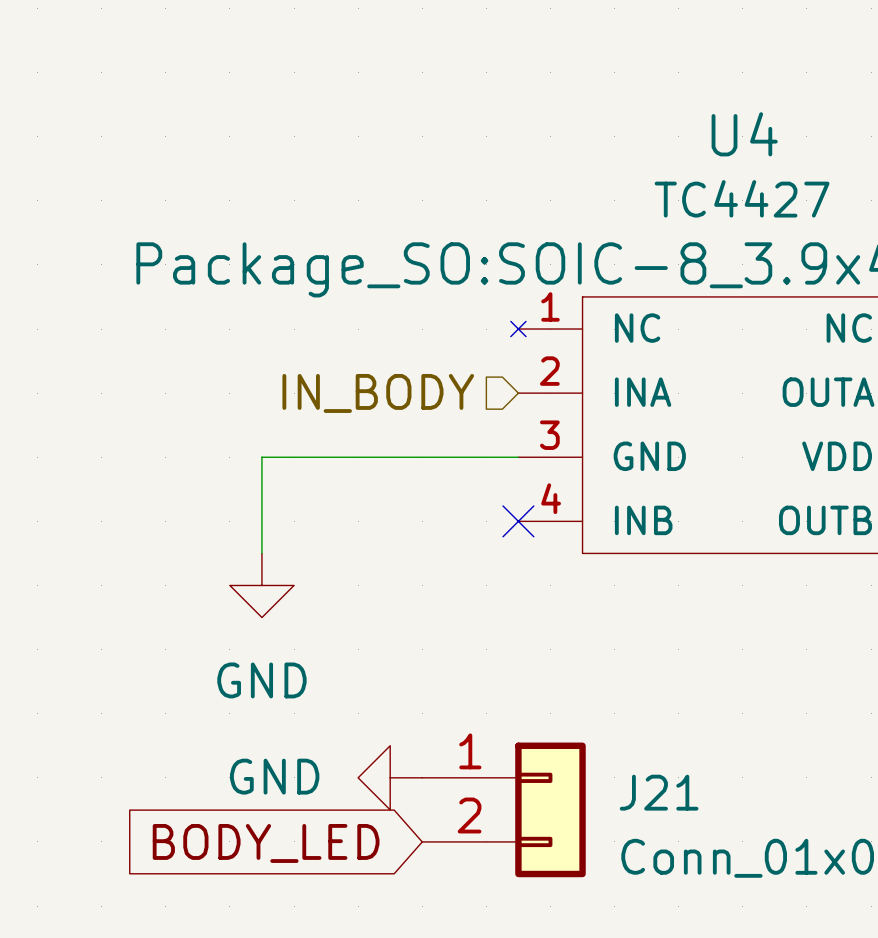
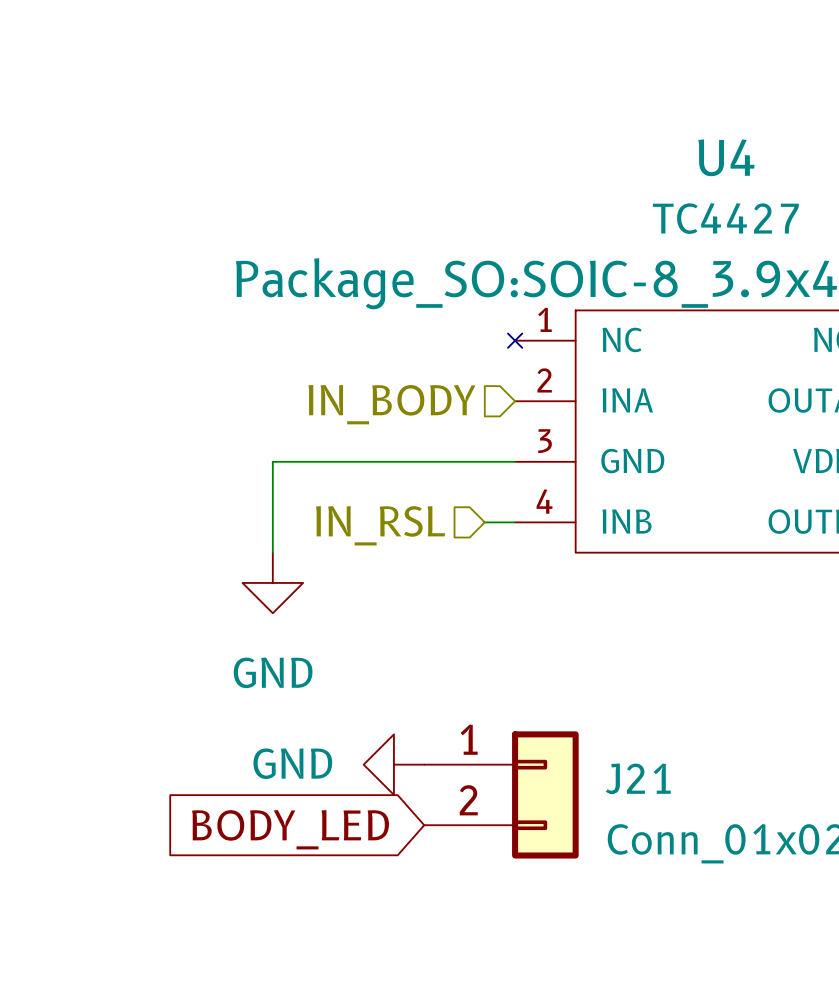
hierarchical label: none -> IN_RSL (380, 525)
wire: none -> (484, 522) (515, 522)
no-connect mark: (518, 521) -> none

